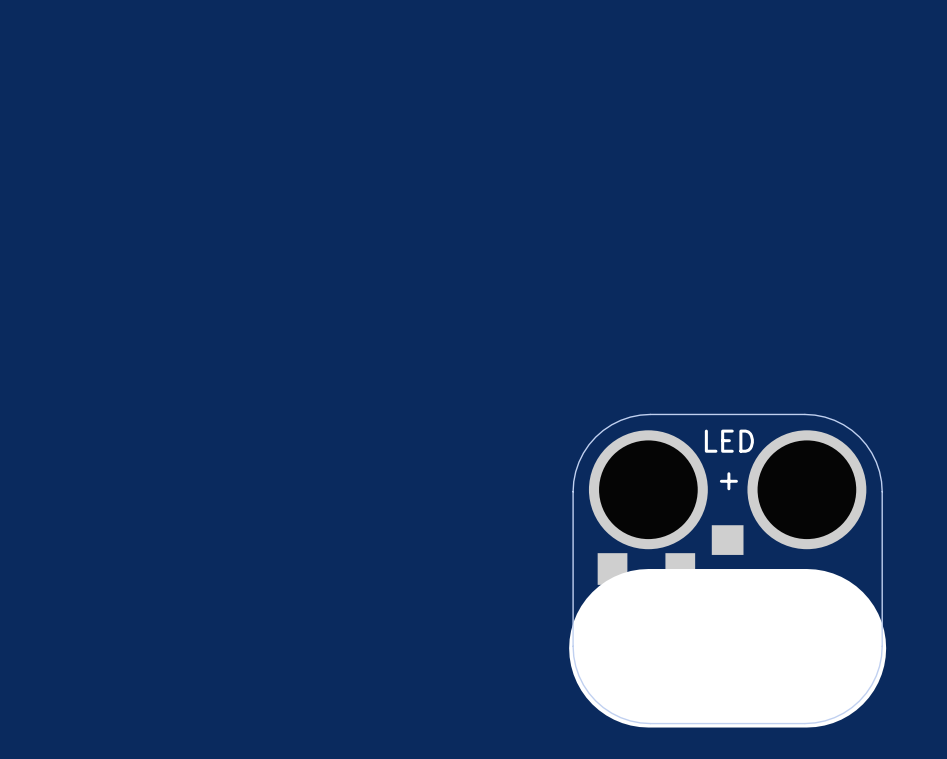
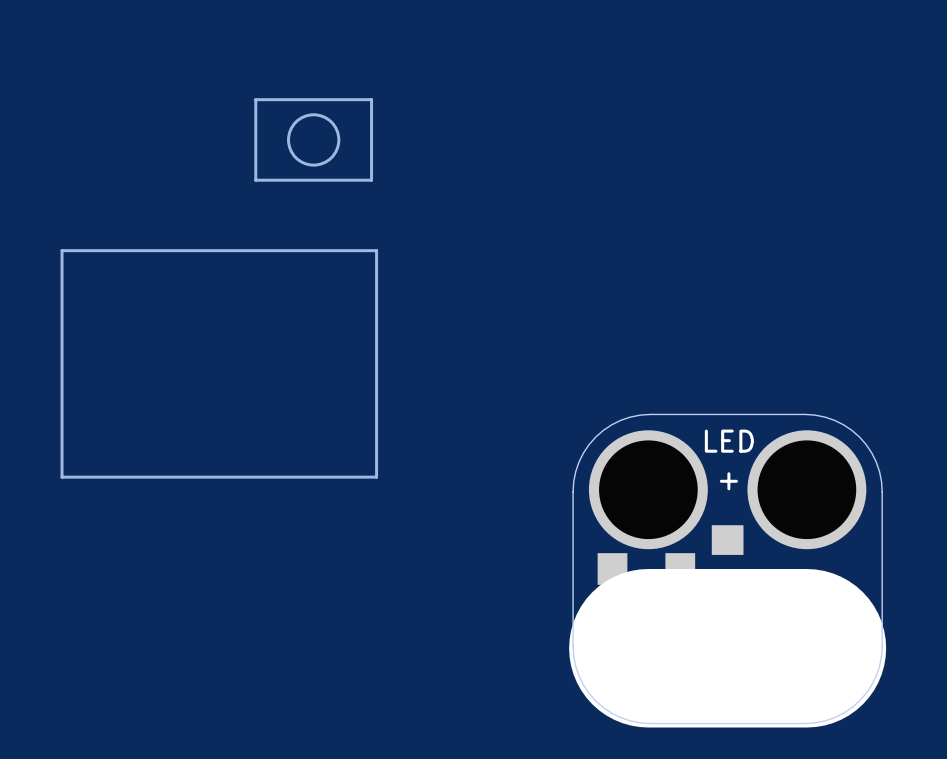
line: none -> (255, 99) (255, 180) (371, 180) (371, 99) (255, 99)
drawing: none -> [287, 113, 341, 167]
line: none -> (62, 250) (62, 477) (376, 477) (376, 250) (62, 250)

